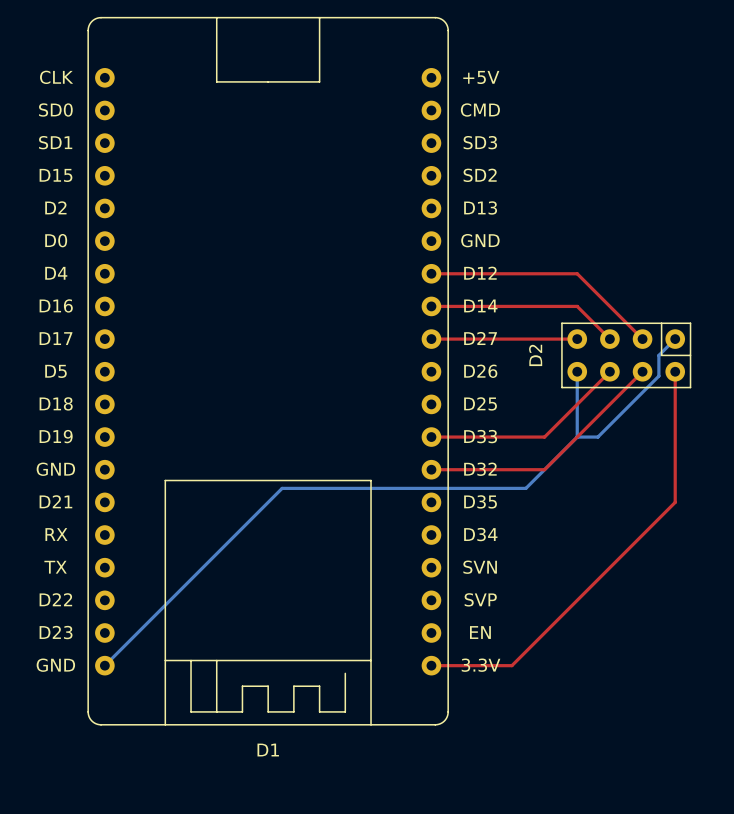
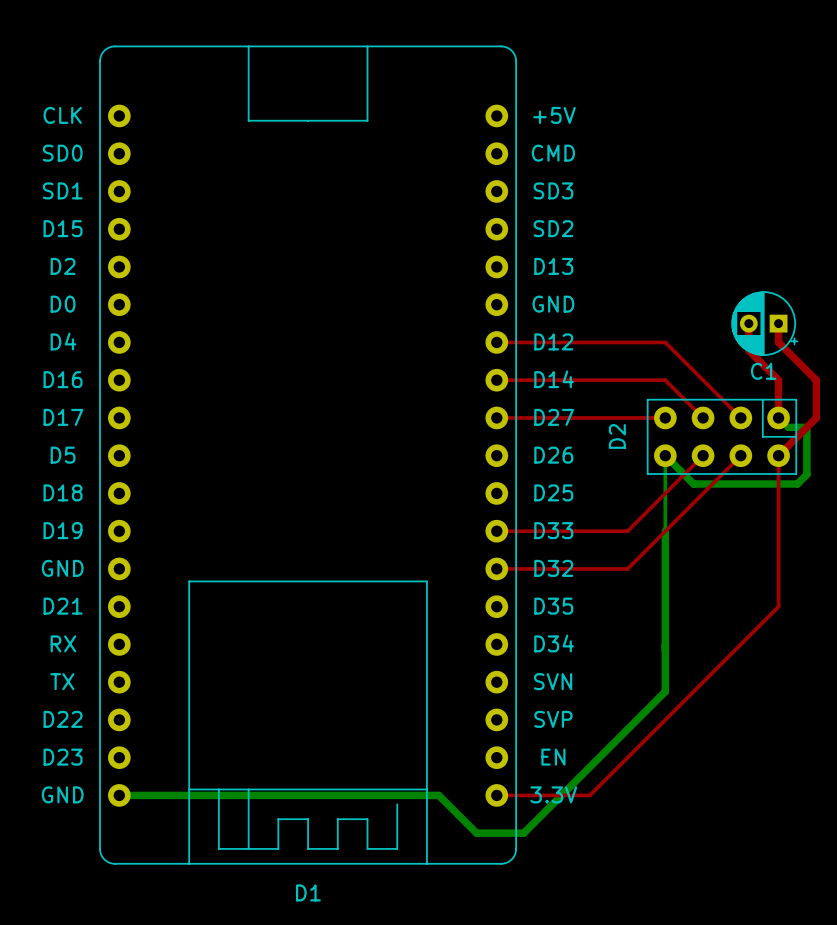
top track: none -> (748, 323) (748, 350) (778, 380) (778, 417)
C1: none -> (764, 323)
top track: none -> (778, 323) (778, 342) (816, 380) (816, 417) (778, 455)
bottom track: (675, 339) (658, 355) (658, 376) (597, 437) (577, 437) (525, 488) (282, 488) (104, 665) -> (665, 531) (665, 691) (523, 833) (476, 833) (438, 795) (119, 795)
bottom track: none -> (778, 417) (788, 427) (806, 427) (806, 474) (797, 484) (693, 484) (665, 455)

